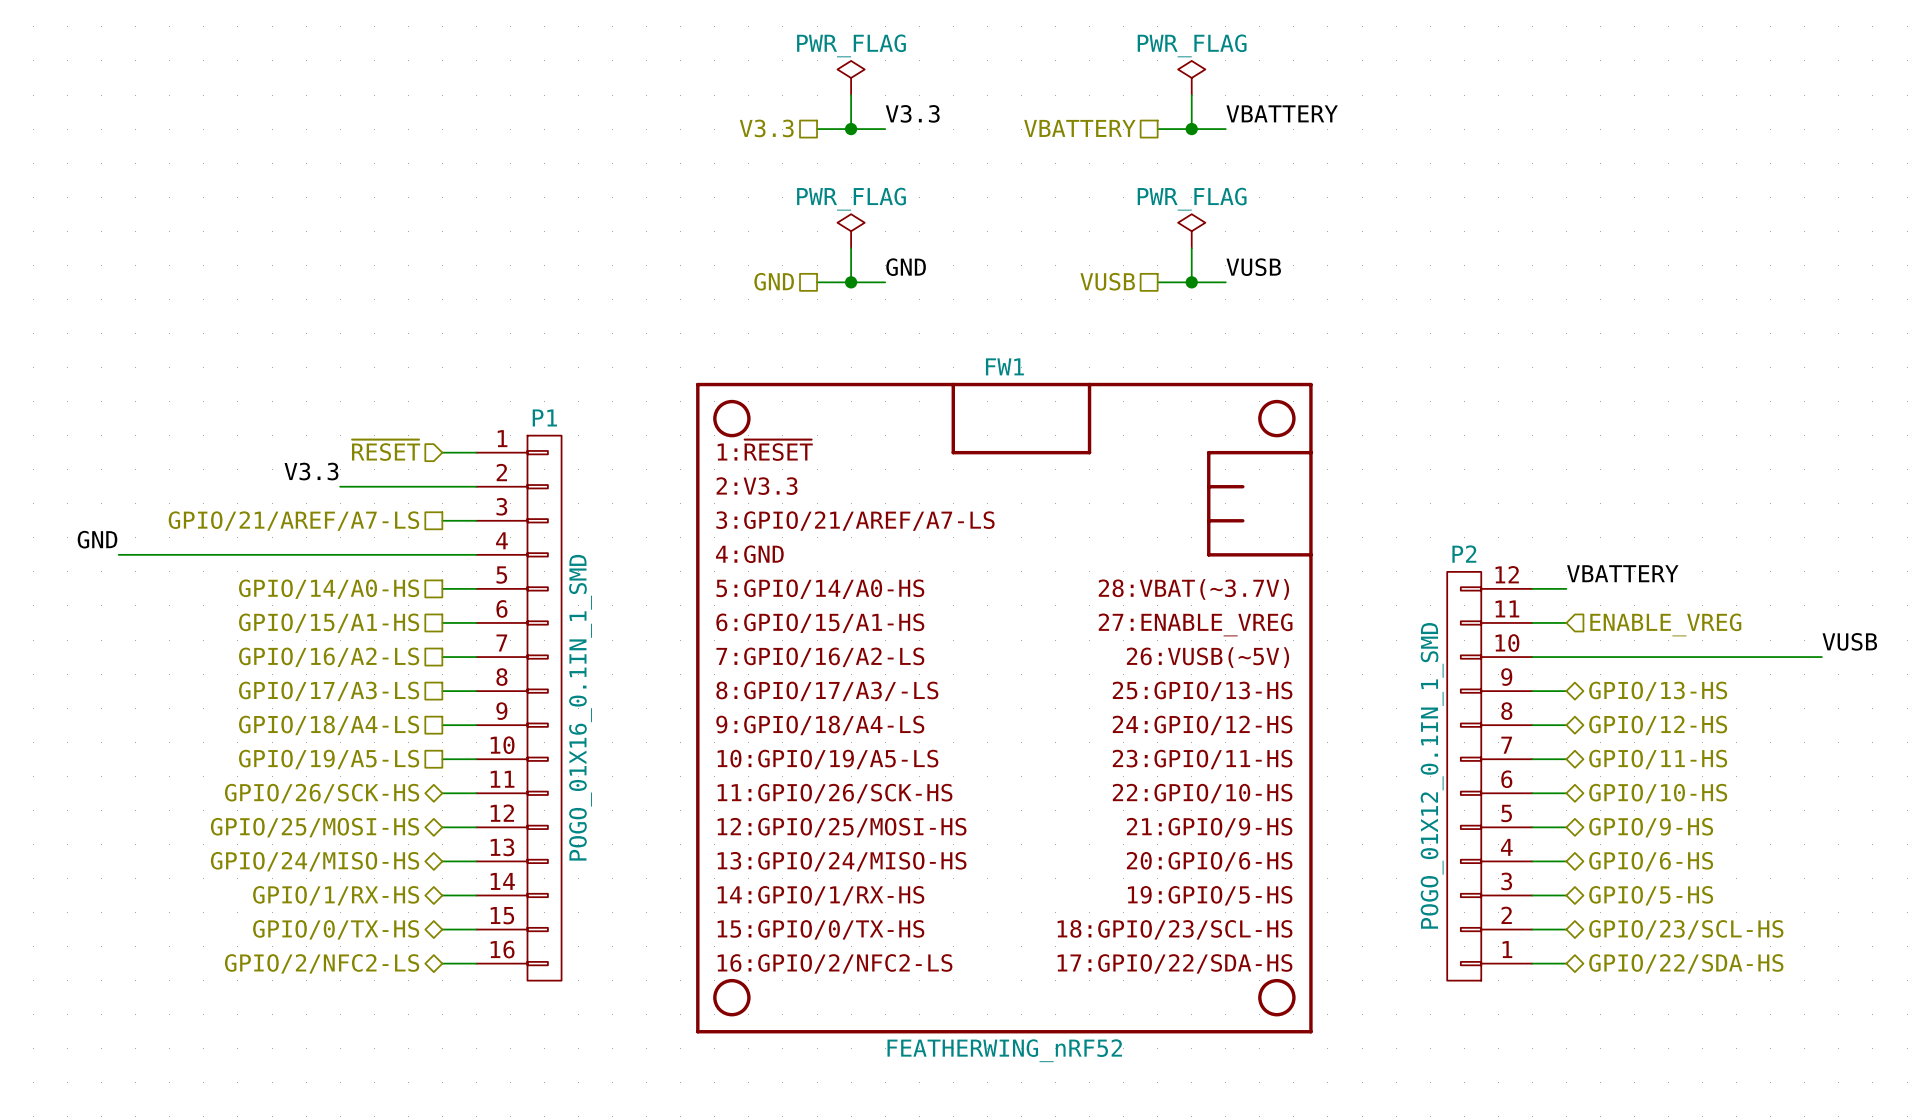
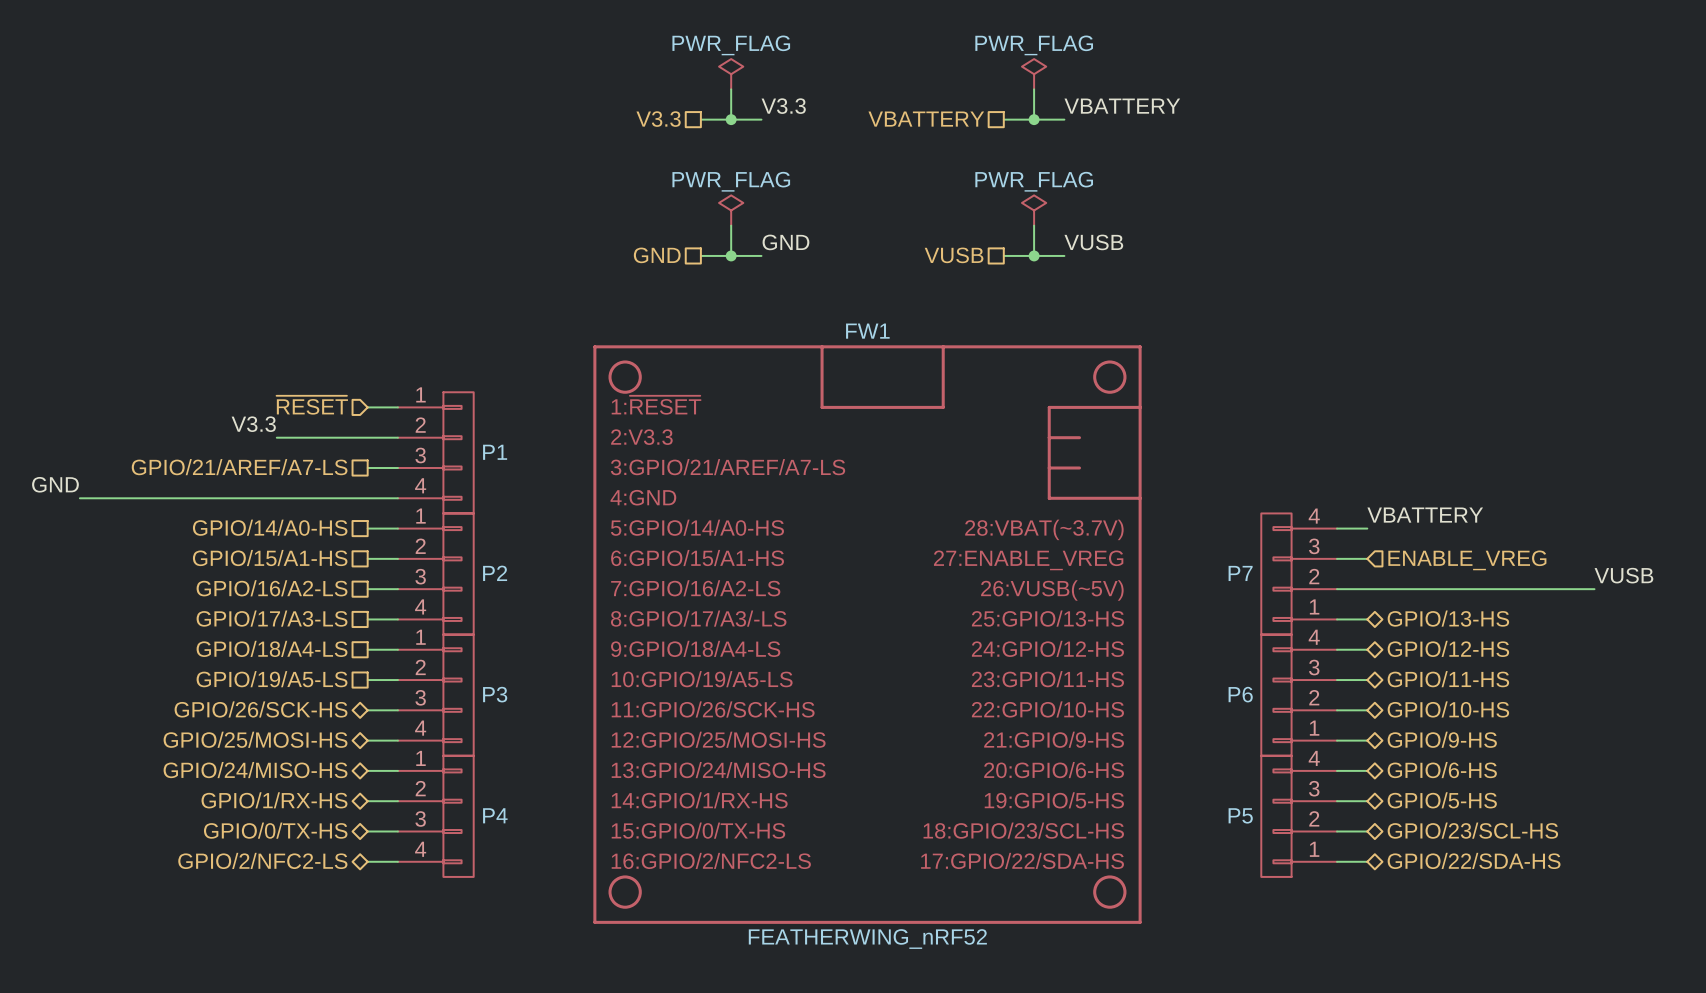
P1 name position: P1 (544, 417) -> P1 (495, 452)
P1 symbol: [476, 435, 562, 981] -> [397, 392, 474, 514]
P2 name position: P2 (1464, 554) -> P2 (495, 573)
P2 symbol: [1447, 571, 1533, 981] -> [397, 513, 474, 635]
P7: none -> (1299, 574)
P1 value: POGO_01X16_0.1IN_1_SMD (580, 707) -> none
P2 value: POGO_01X12_0.1IN_1_SMD (1432, 775) -> none
P3: none -> (435, 695)
P6: none -> (1299, 695)
P4: none -> (435, 816)
P5: none -> (1299, 816)

